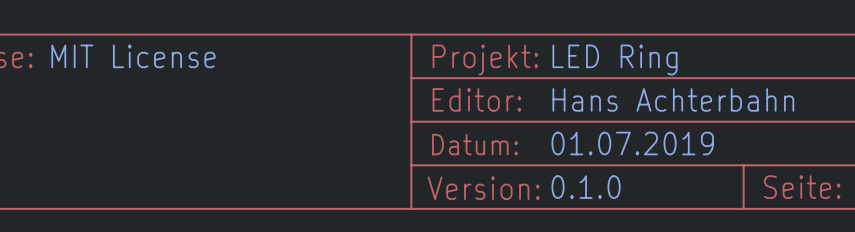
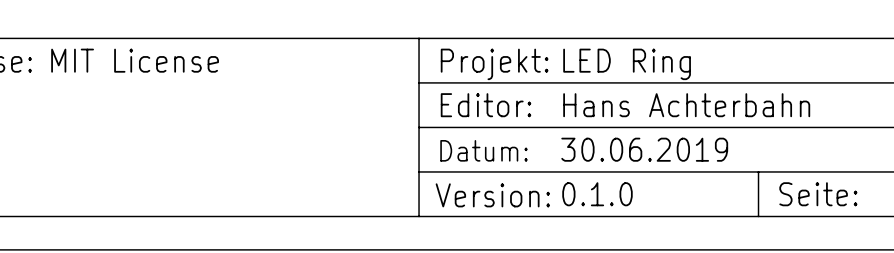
text: 01.07.2019 (632, 143) -> 30.06.2019 (644, 149)

